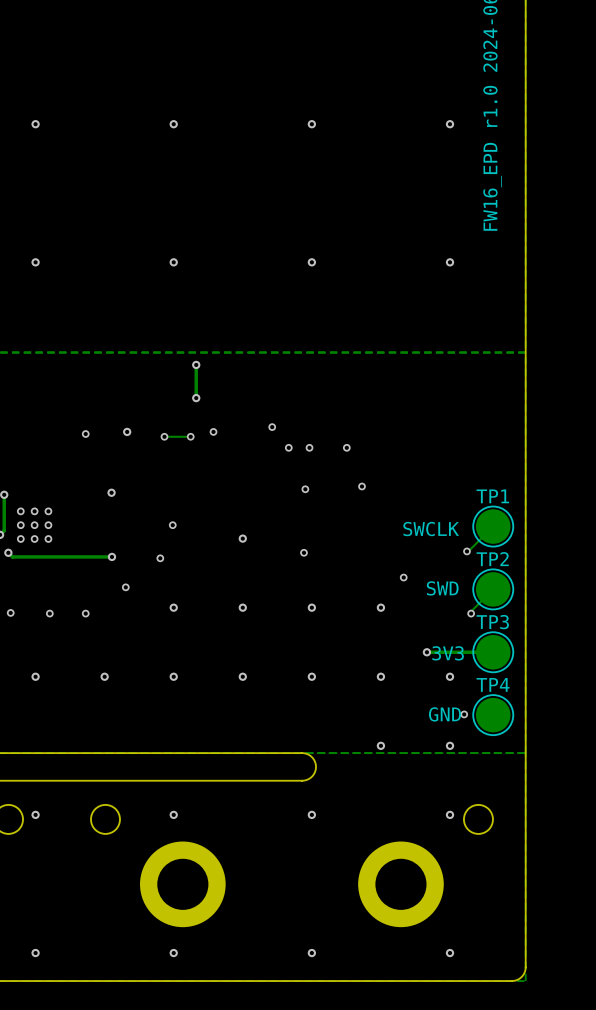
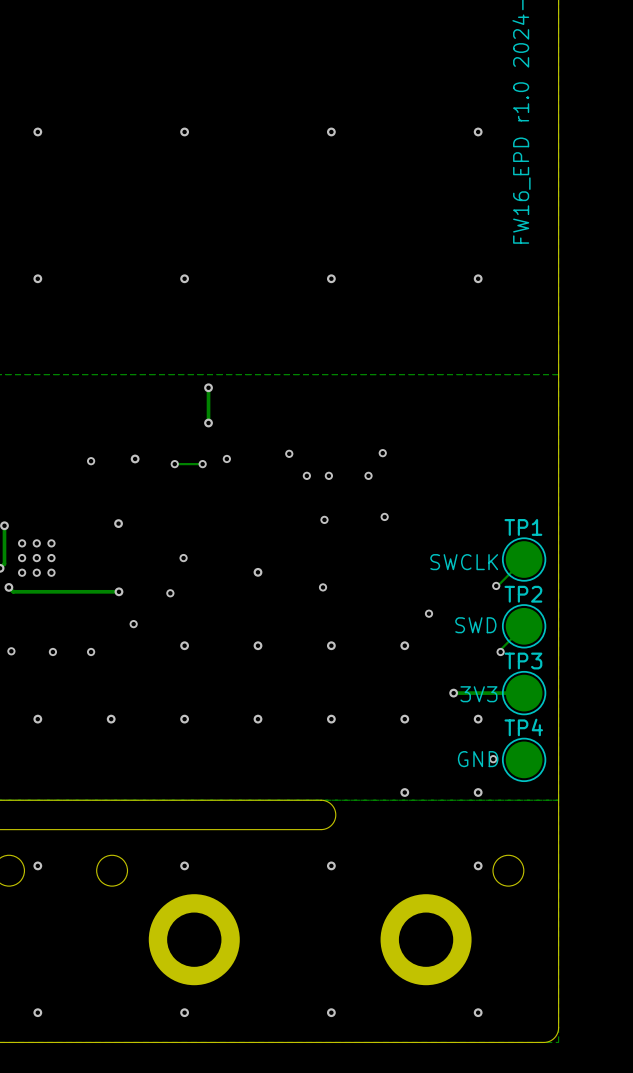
via: none -> (382, 453)

